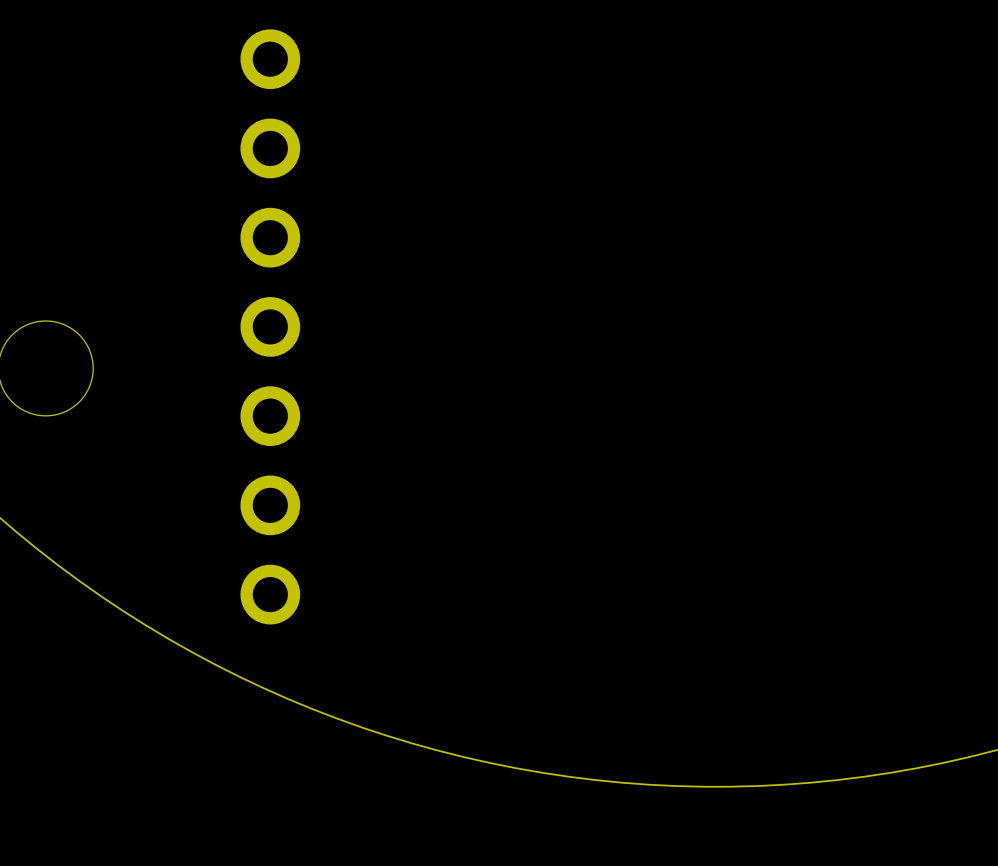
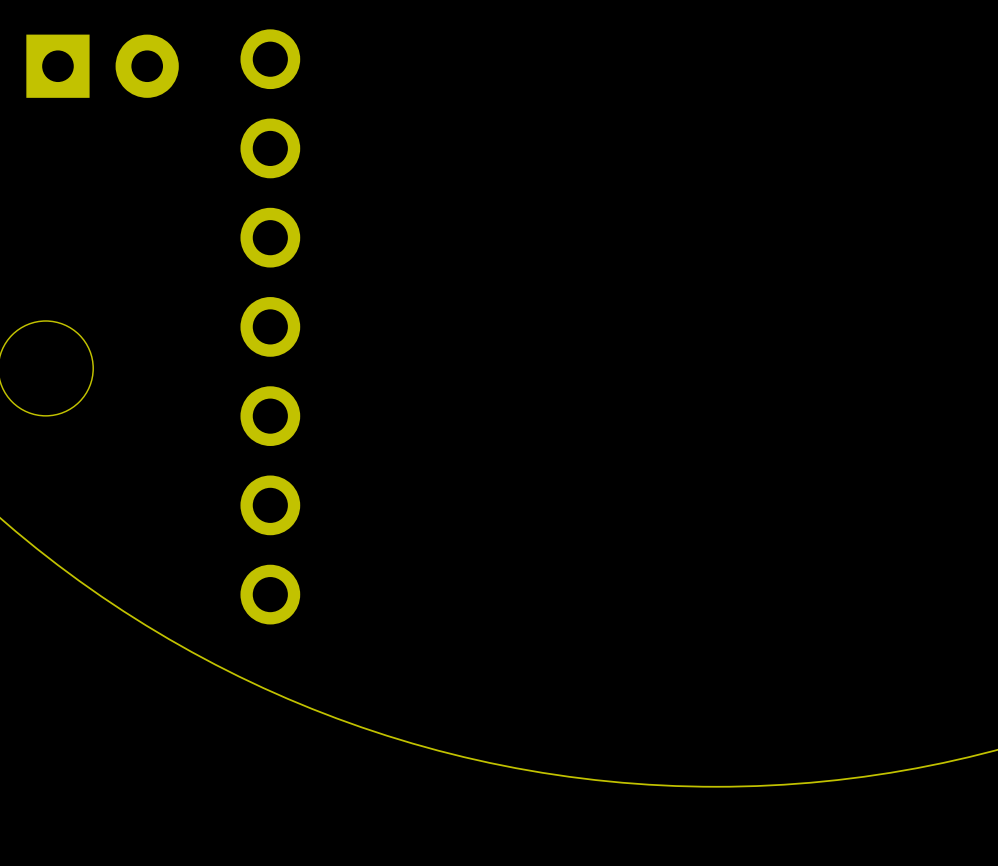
part: none -> (102, 66)

